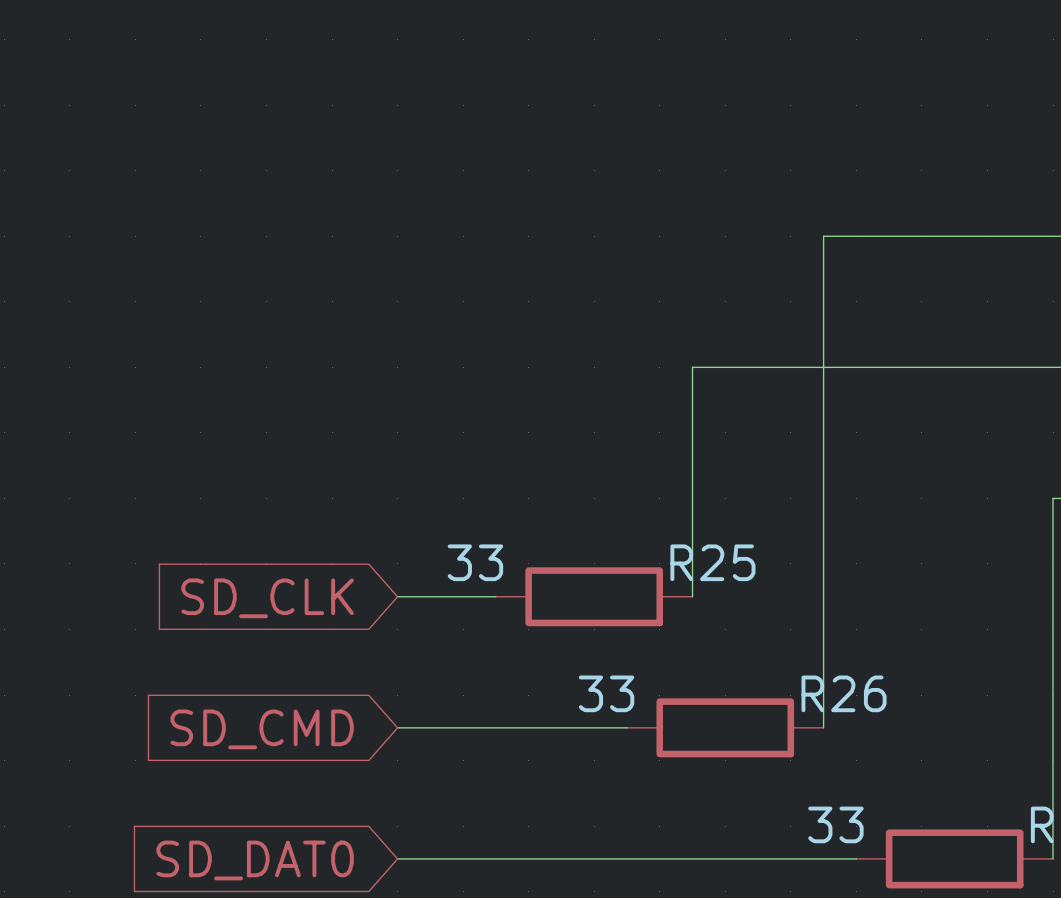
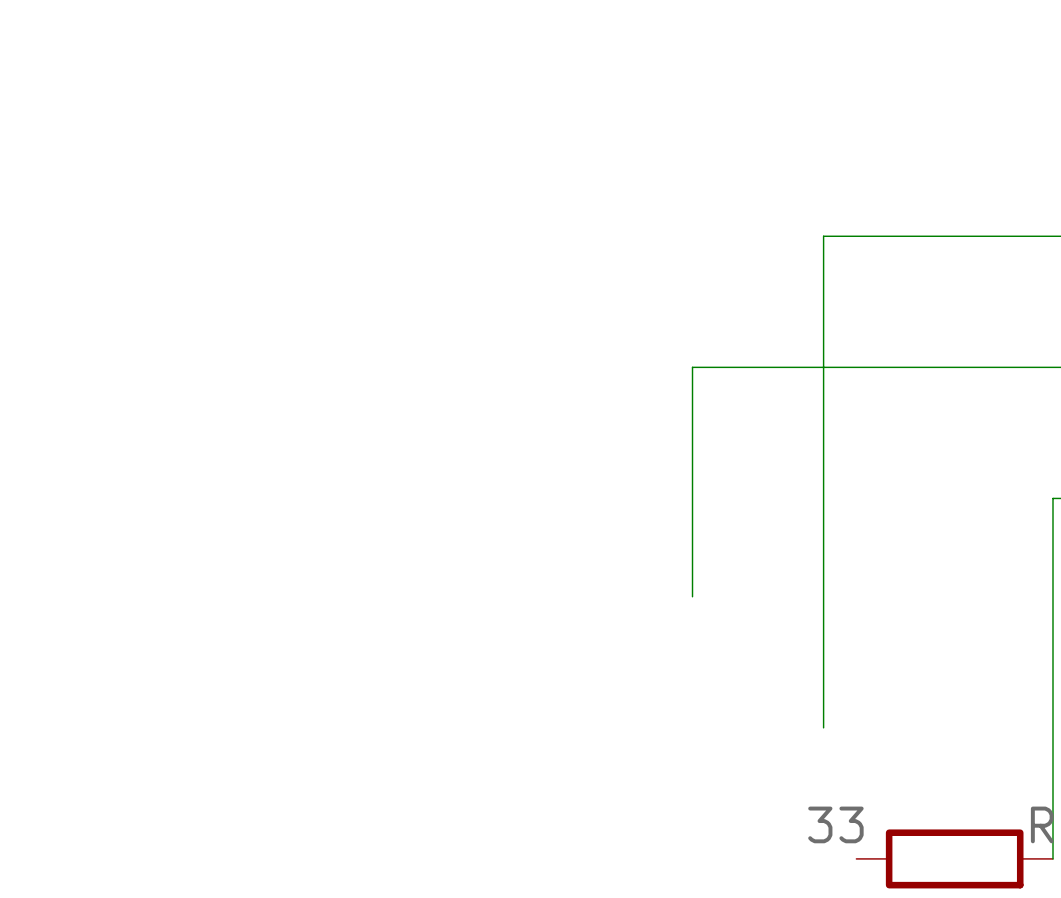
wire: (397, 596) (495, 596) -> none
R25: 33 (594, 596) -> none
global label: SD_CLK (267, 598) -> none
wire: (397, 727) (626, 727) -> none
R26: 33 (725, 727) -> none
global label: SD_CMD (262, 729) -> none
wire: (397, 858) (856, 858) -> none
global label: SD_DAT0 (255, 860) -> none

